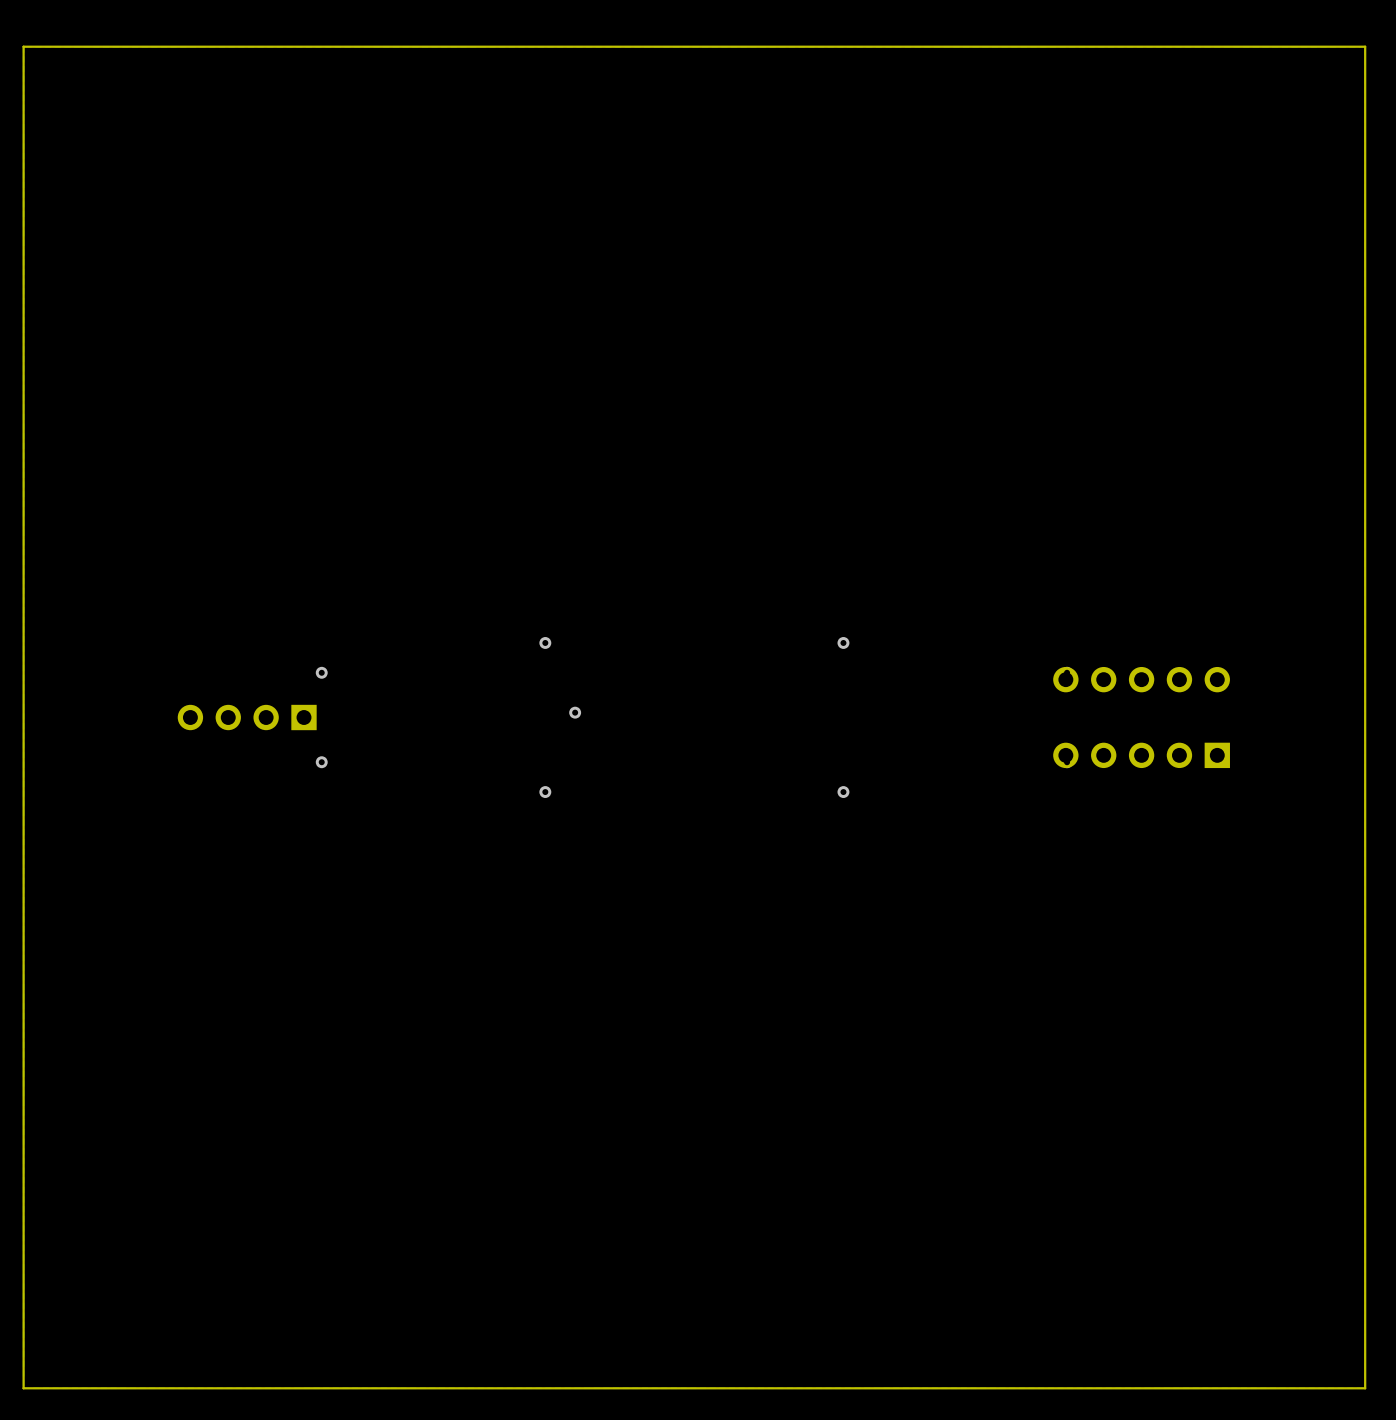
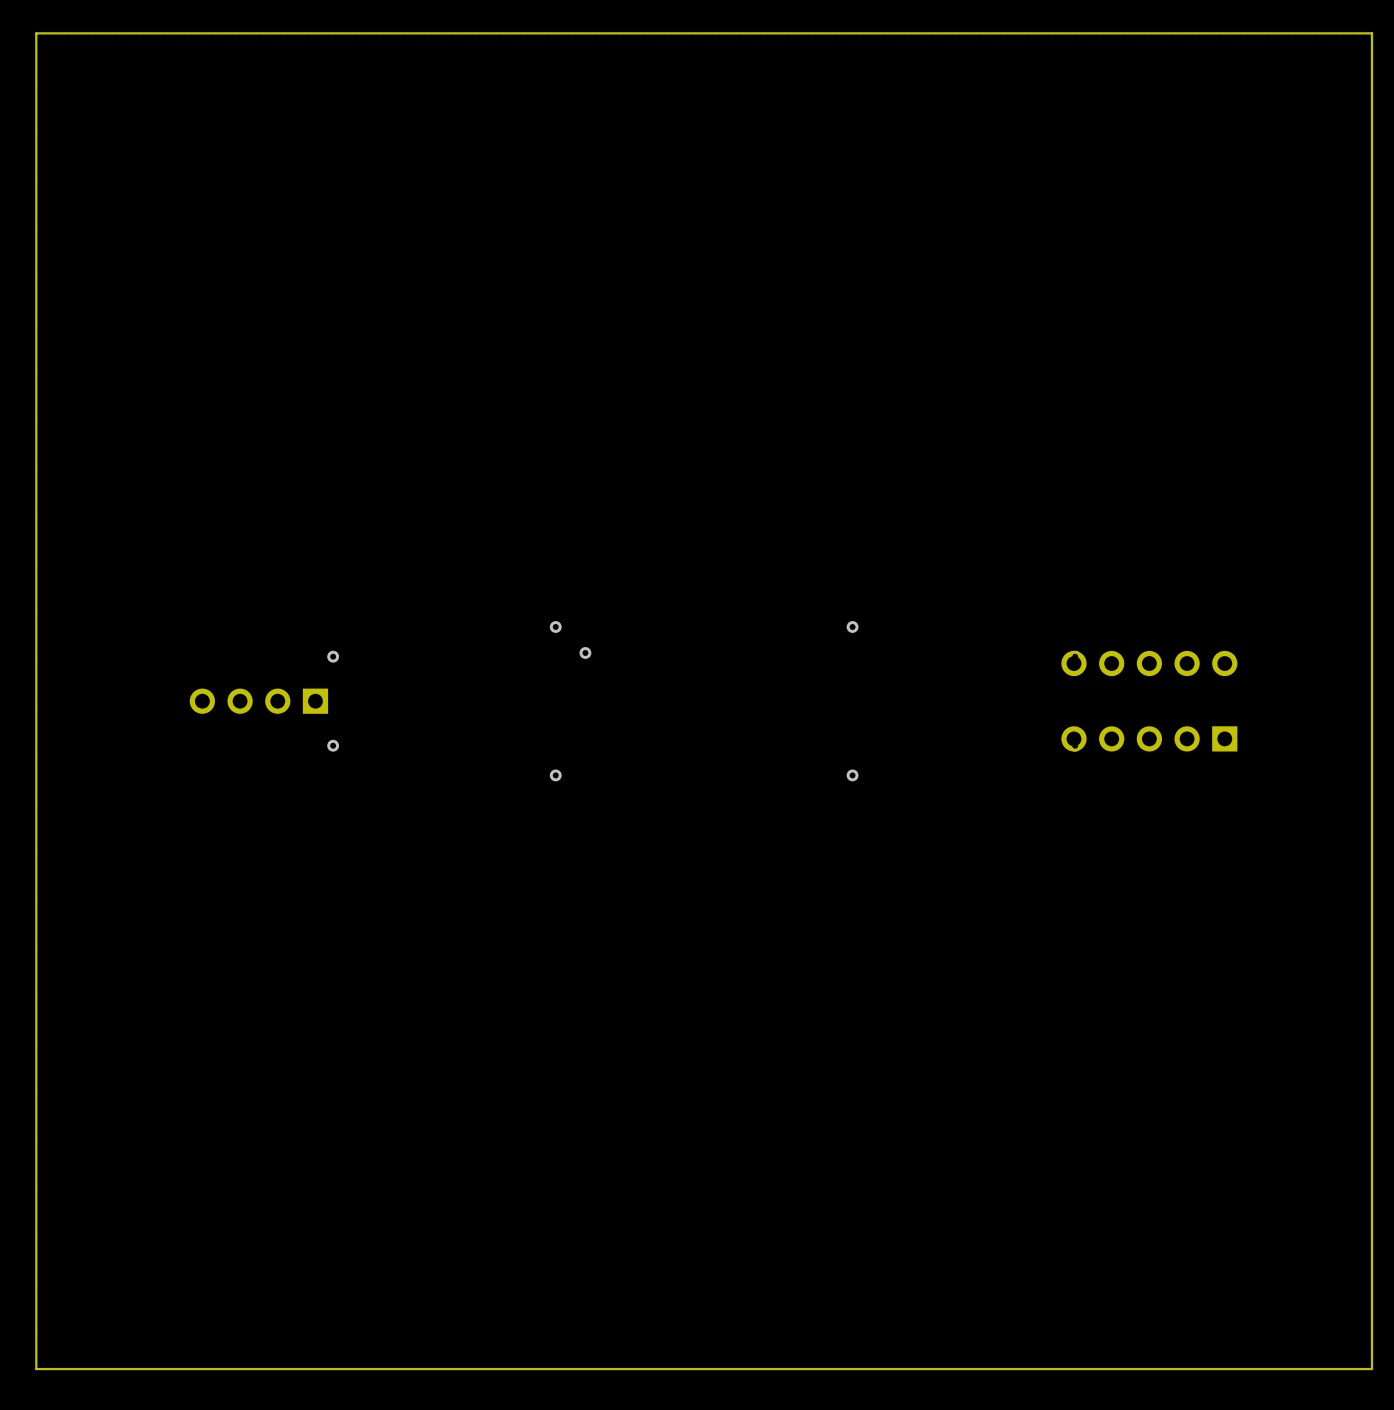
via position: (575, 712) -> (585, 652)

